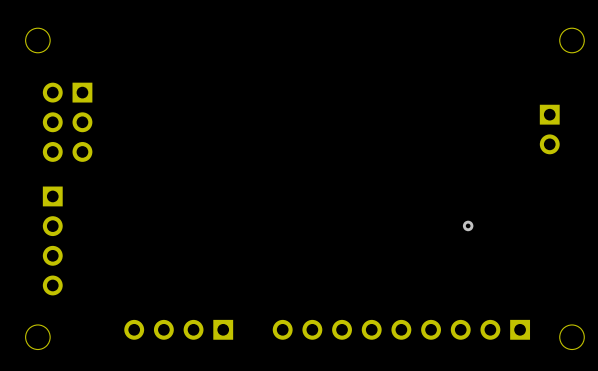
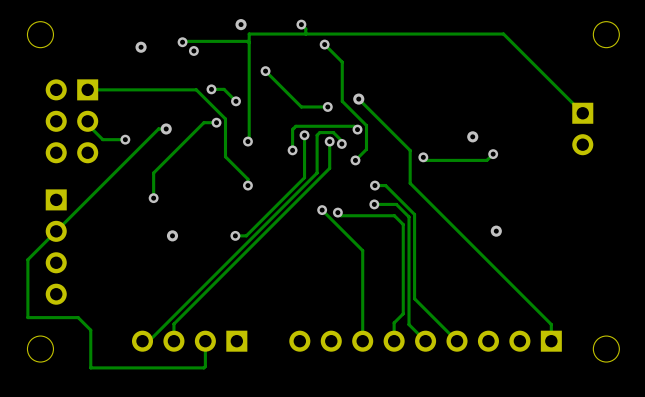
via: none -> (241, 24)
track: none -> (301, 24) (305, 29) (305, 34)
via: none -> (301, 24)
track: none -> (182, 42) (249, 42)
via: none -> (182, 42)
track: none -> (324, 44) (342, 62) (342, 101) (366, 125) (366, 149) (355, 160)
via: none -> (324, 44)
via: none -> (141, 47)
via: none -> (193, 50)
track: none -> (265, 71) (301, 106) (327, 106)
via: none -> (265, 71)
track: none -> (84, 89) (196, 89) (225, 118) (225, 156) (247, 179) (247, 185)
track: none -> (211, 89) (224, 89) (236, 101)
via: none -> (211, 89)
track: none -> (358, 99) (410, 150) (410, 183) (551, 324) (551, 341)
via: none -> (358, 99)
via: none -> (236, 101)
via: none -> (327, 106)
track: none -> (582, 113) (503, 34) (249, 34) (247, 141)
track: none -> (84, 121) (102, 139) (125, 139)
track: none -> (216, 122) (203, 122) (153, 172) (153, 198)
via: none -> (216, 122)
track: none -> (166, 128) (158, 128) (27, 259) (27, 317) (78, 317) (90, 330) (90, 367) (203, 367) (205, 341)
via: none -> (166, 128)
track: none -> (357, 129) (354, 126) (295, 126) (292, 129) (292, 150)
via: none -> (357, 129)
track: none -> (304, 135) (304, 177) (246, 235) (235, 235)
via: none -> (304, 135)
via: none -> (472, 136)
via: none -> (125, 139)
via: none -> (247, 141)
track: none -> (329, 141) (329, 168) (173, 324) (173, 341)
via: none -> (329, 141)
track: none -> (341, 143) (341, 141) (333, 132) (319, 132) (317, 135) (317, 172) (148, 341) (142, 341)
via: none -> (341, 143)
via: none -> (292, 150)
track: none -> (493, 154) (486, 160) (426, 160) (423, 157)
via: none -> (493, 154)
via: none -> (423, 157)
via: none -> (355, 160)
via: none -> (247, 185)
track: none -> (374, 185) (385, 185) (414, 214) (414, 298) (457, 341)
via: none -> (374, 185)
via: none -> (153, 198)
track: none -> (374, 204) (396, 204) (409, 217) (409, 324) (425, 341)
via: none -> (374, 204)
track: none -> (322, 210) (362, 250) (362, 341)
via: none -> (322, 210)
track: none -> (337, 212) (341, 215) (394, 215) (403, 224) (403, 313) (394, 322) (394, 341)
via: none -> (337, 212)
via: none -> (172, 235)
via: none -> (235, 235)

